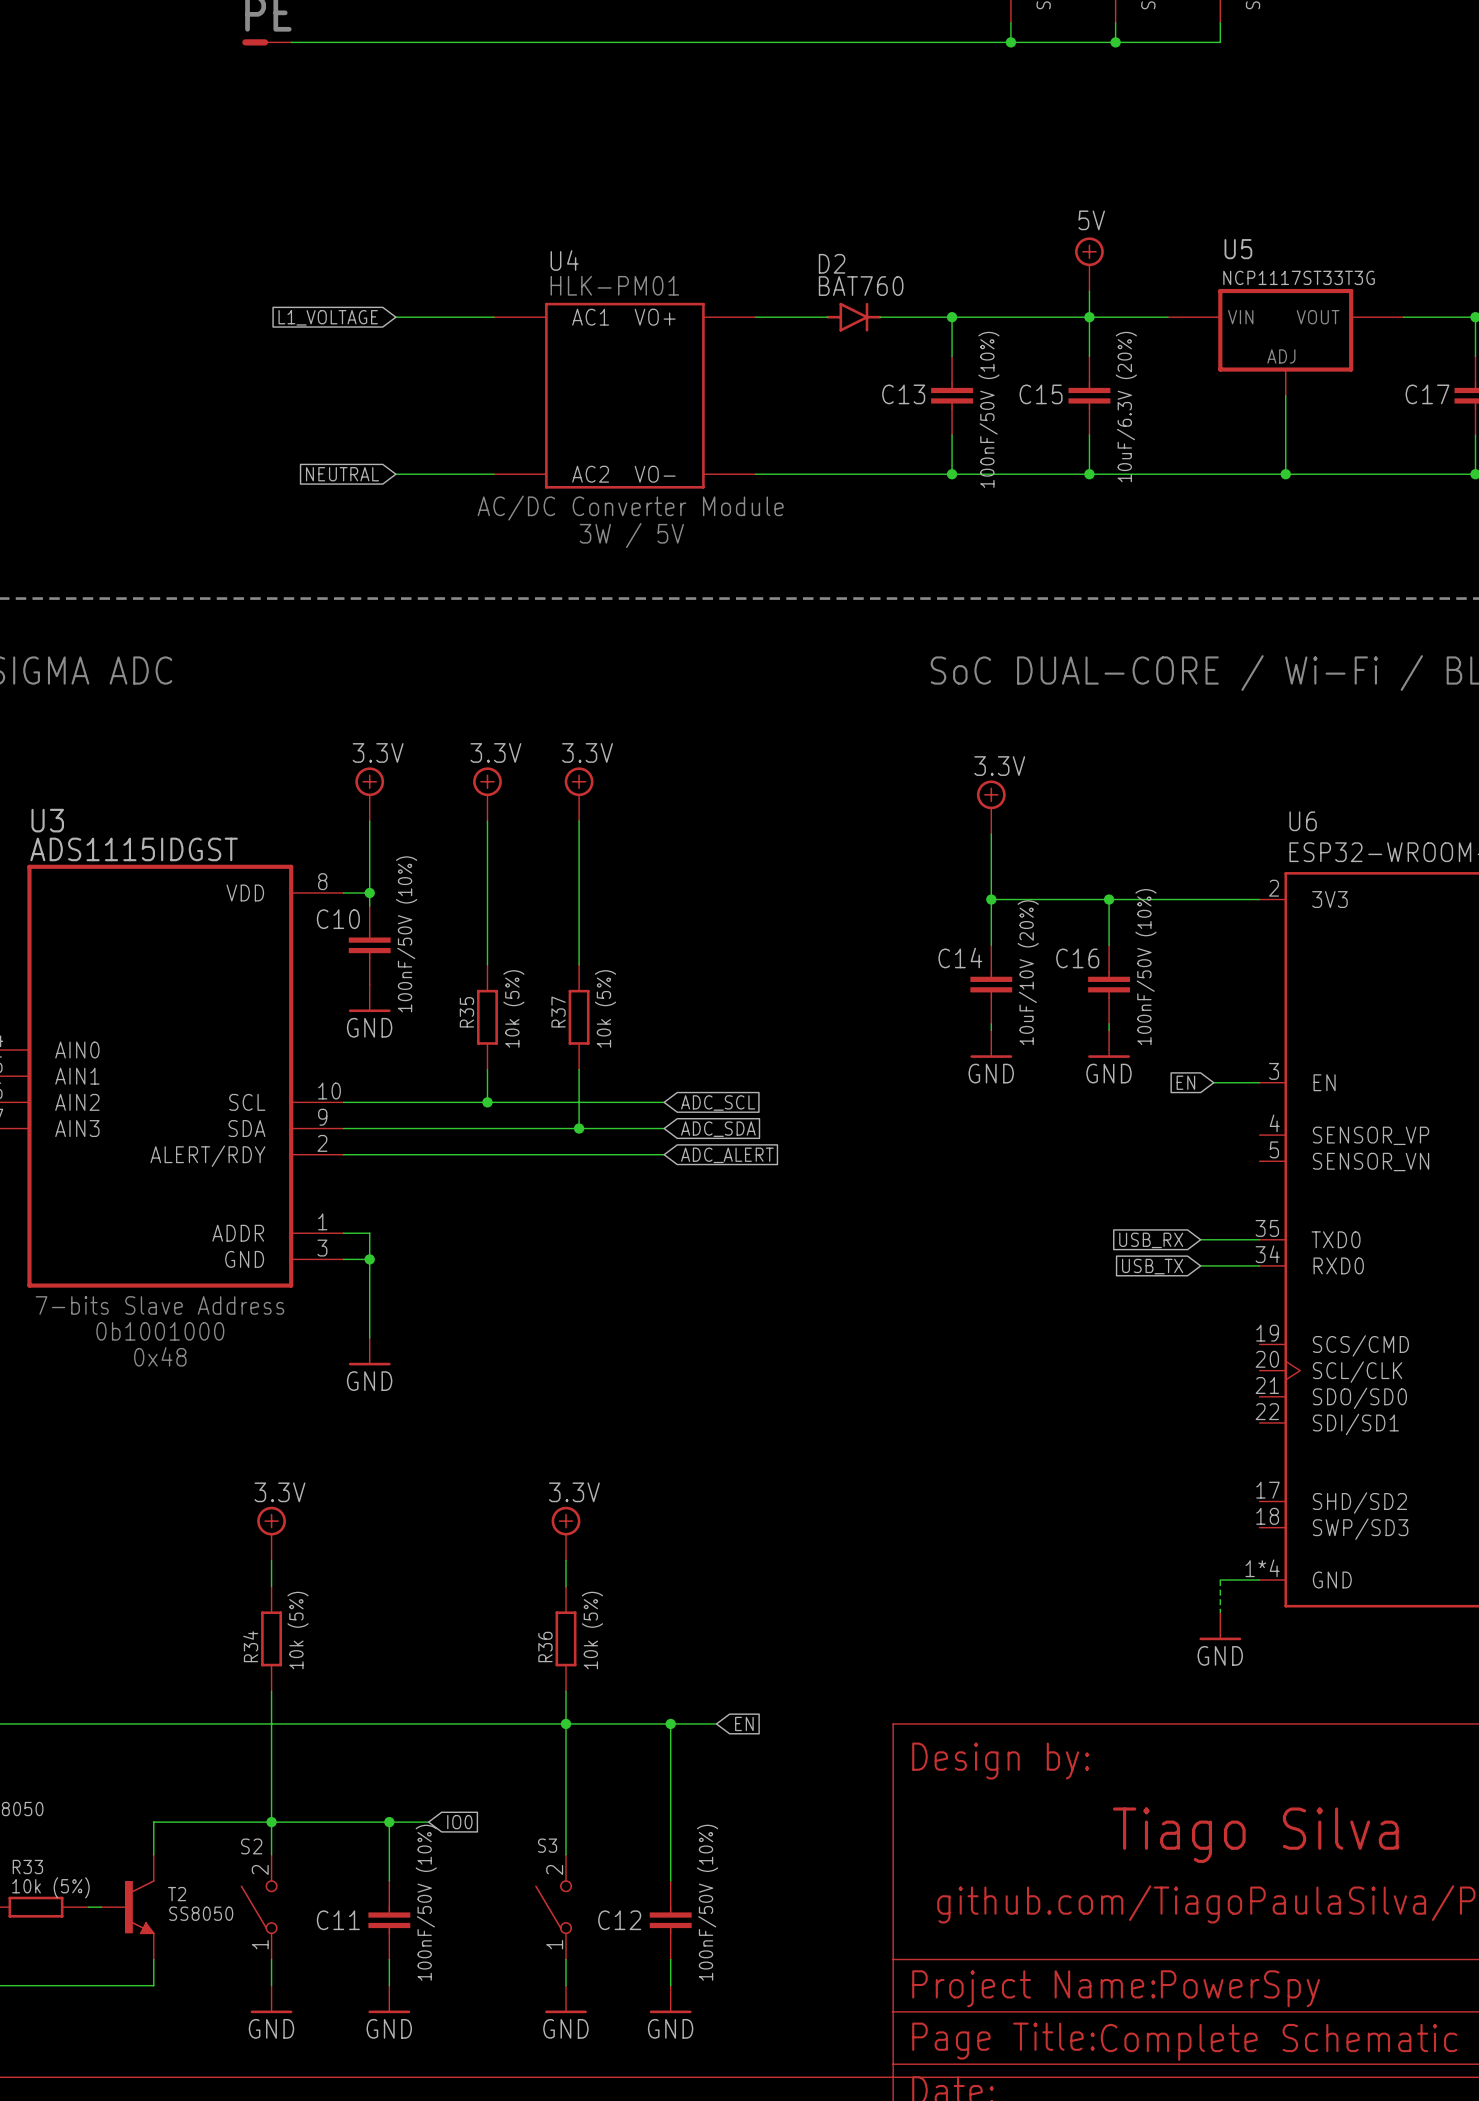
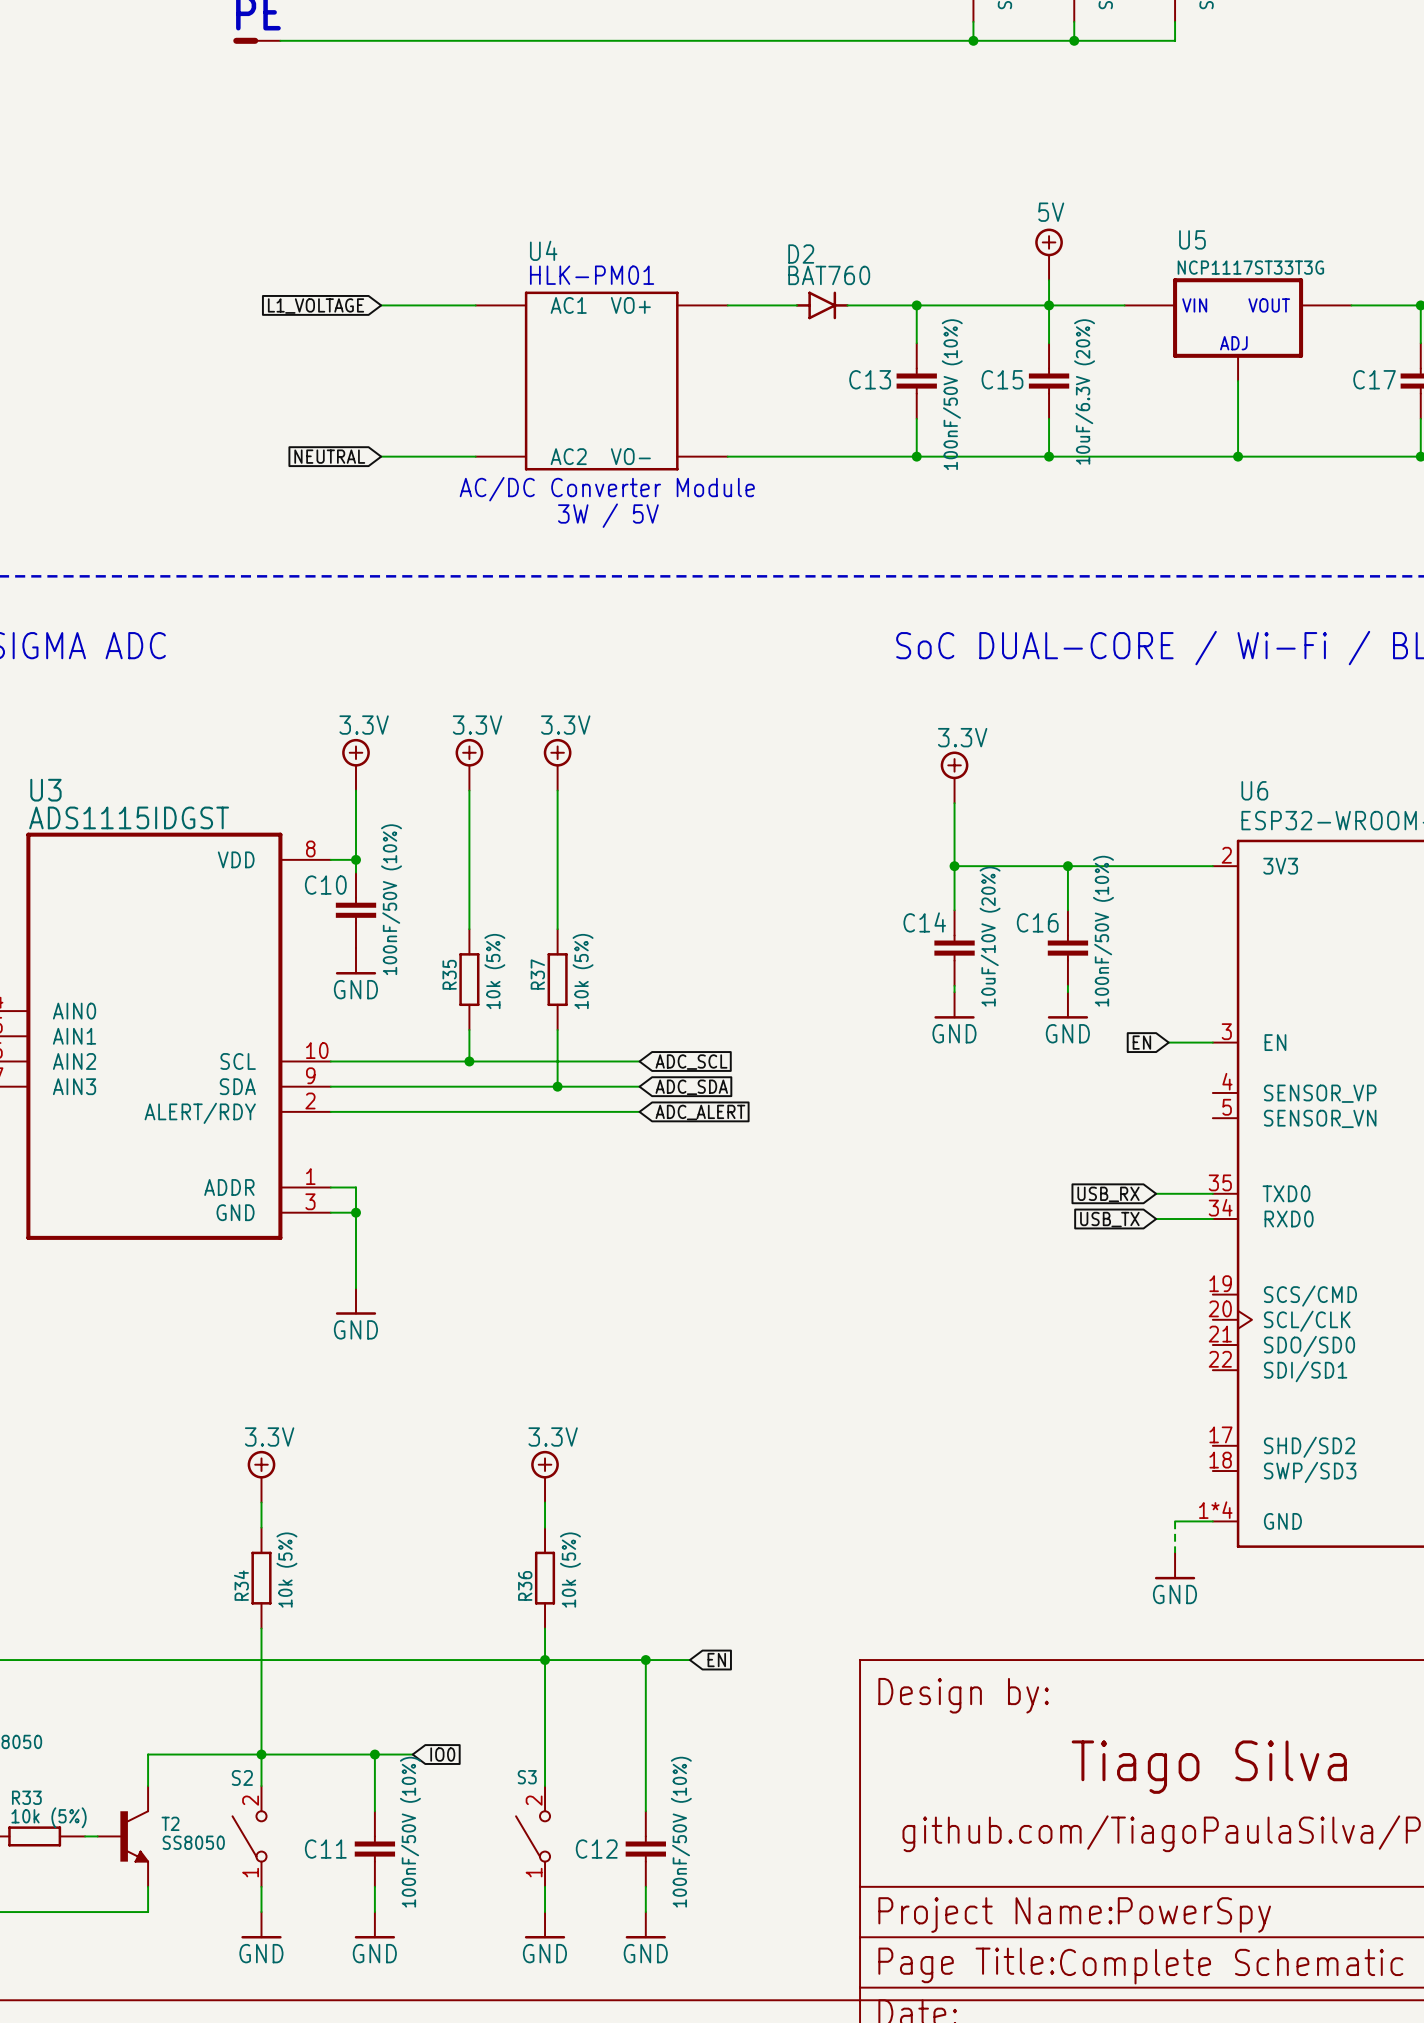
text: 7-bits Slave Address (159, 1305) -> none
text: 0b1001000 (160, 1331) -> none
text: 0x48 (160, 1356) -> none

